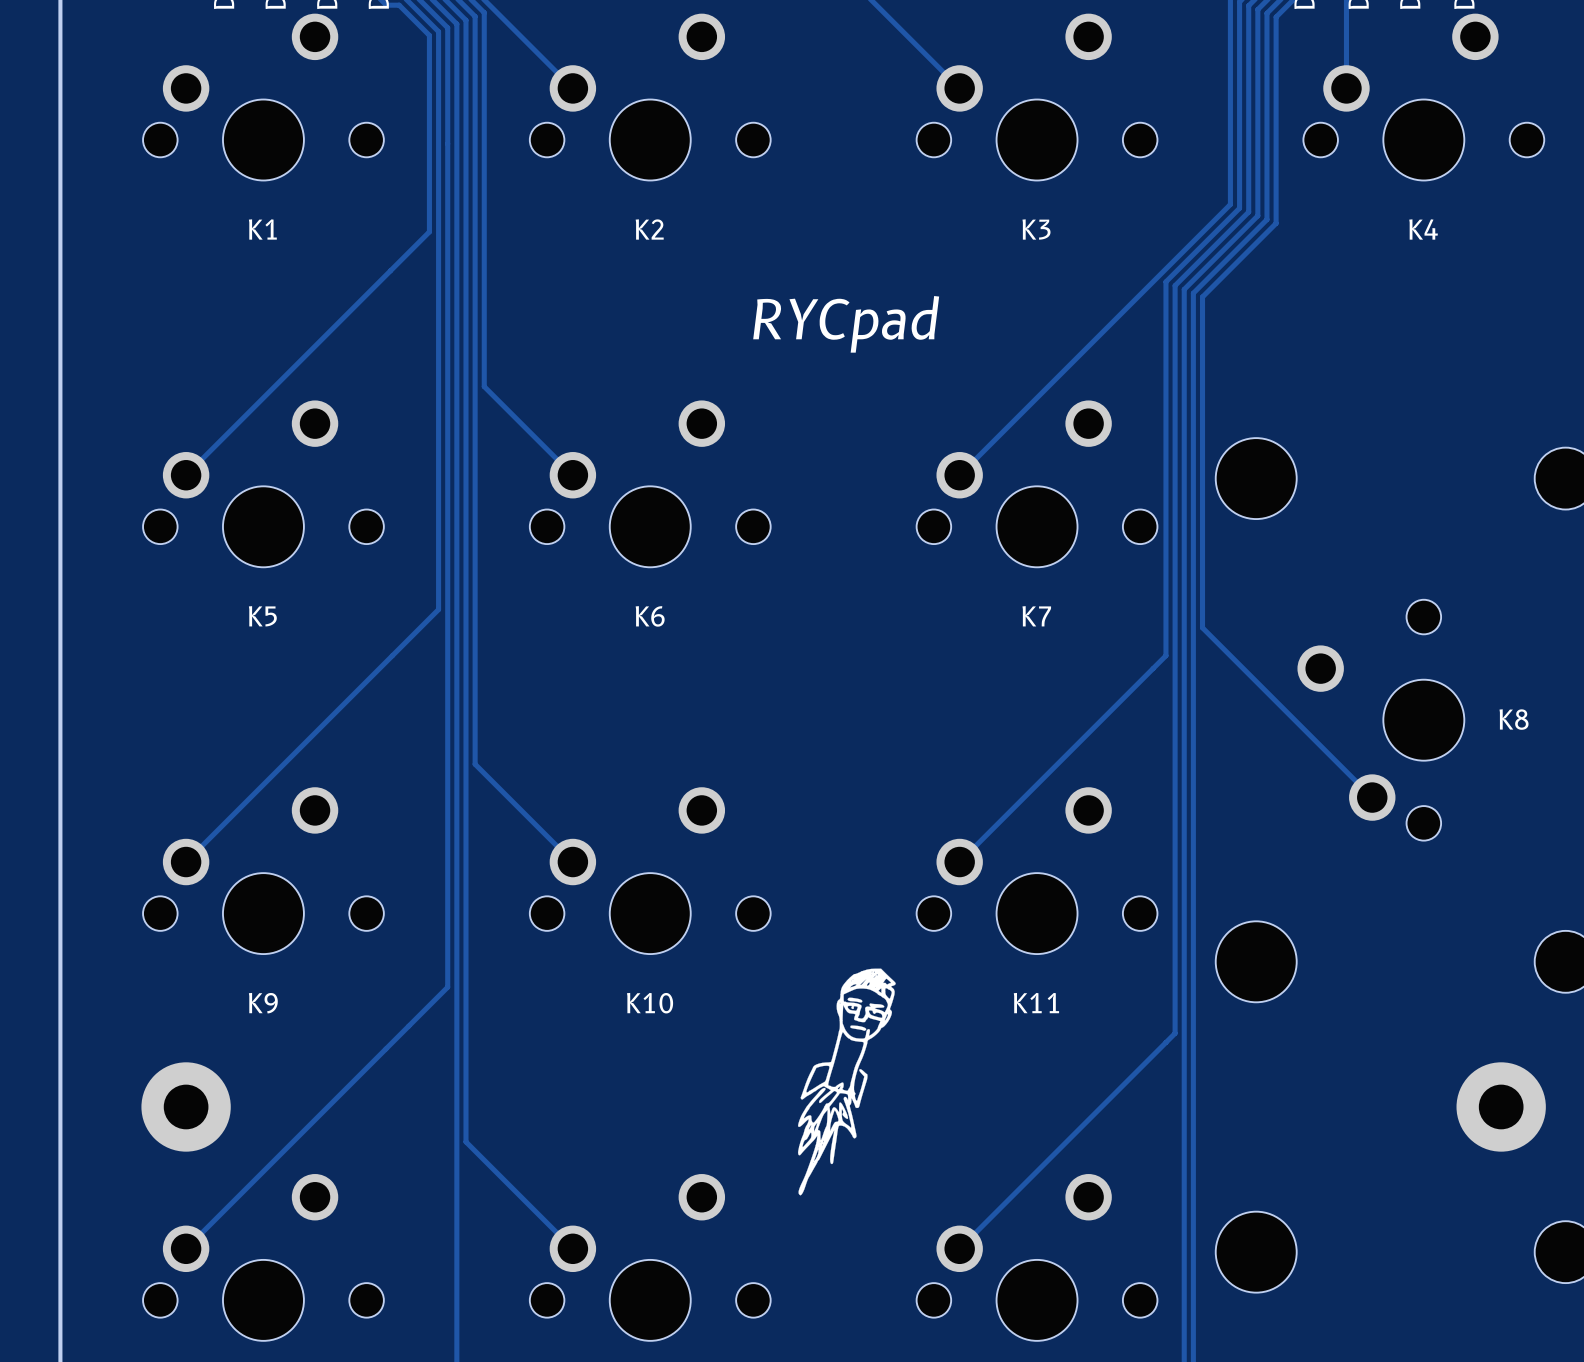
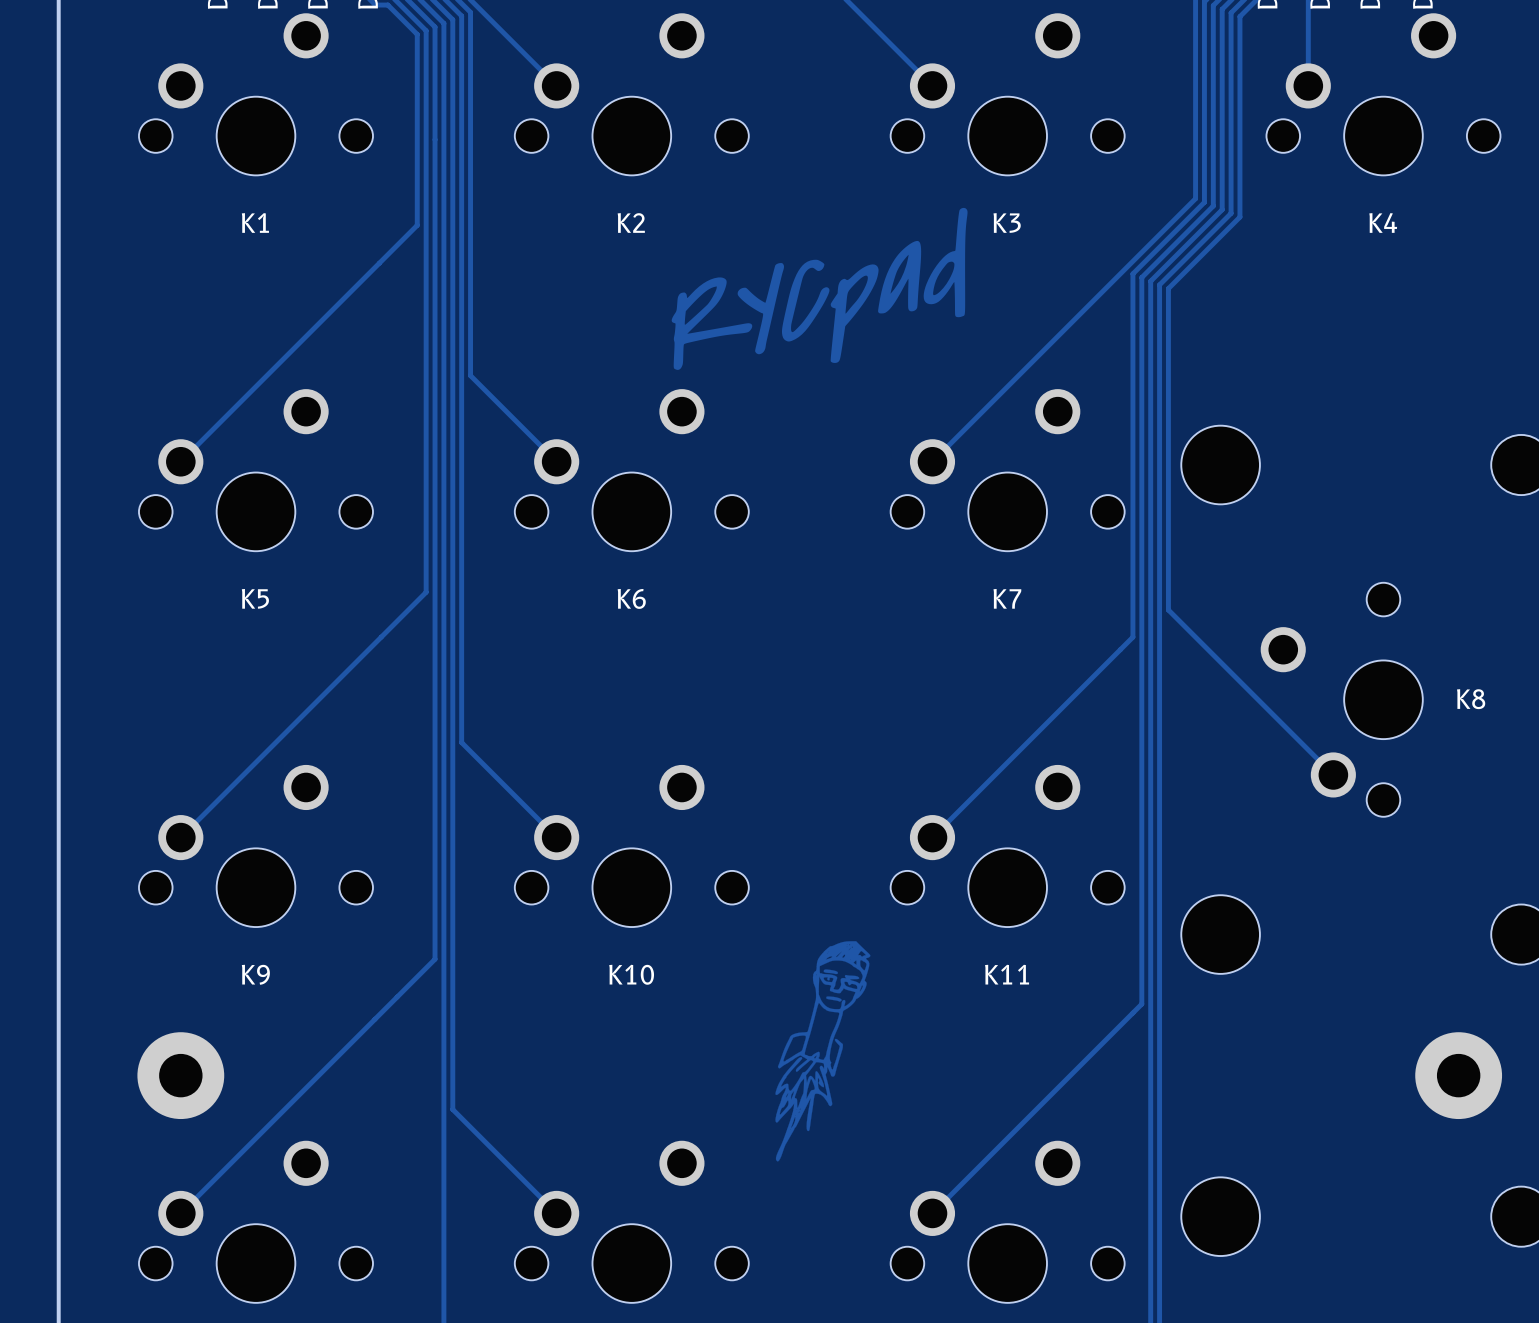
drawing: none -> [671, 207, 968, 370]
text: RYCpad (846, 324) -> none
drawing shape: [797, 968, 896, 1196] -> [775, 941, 871, 1162]

